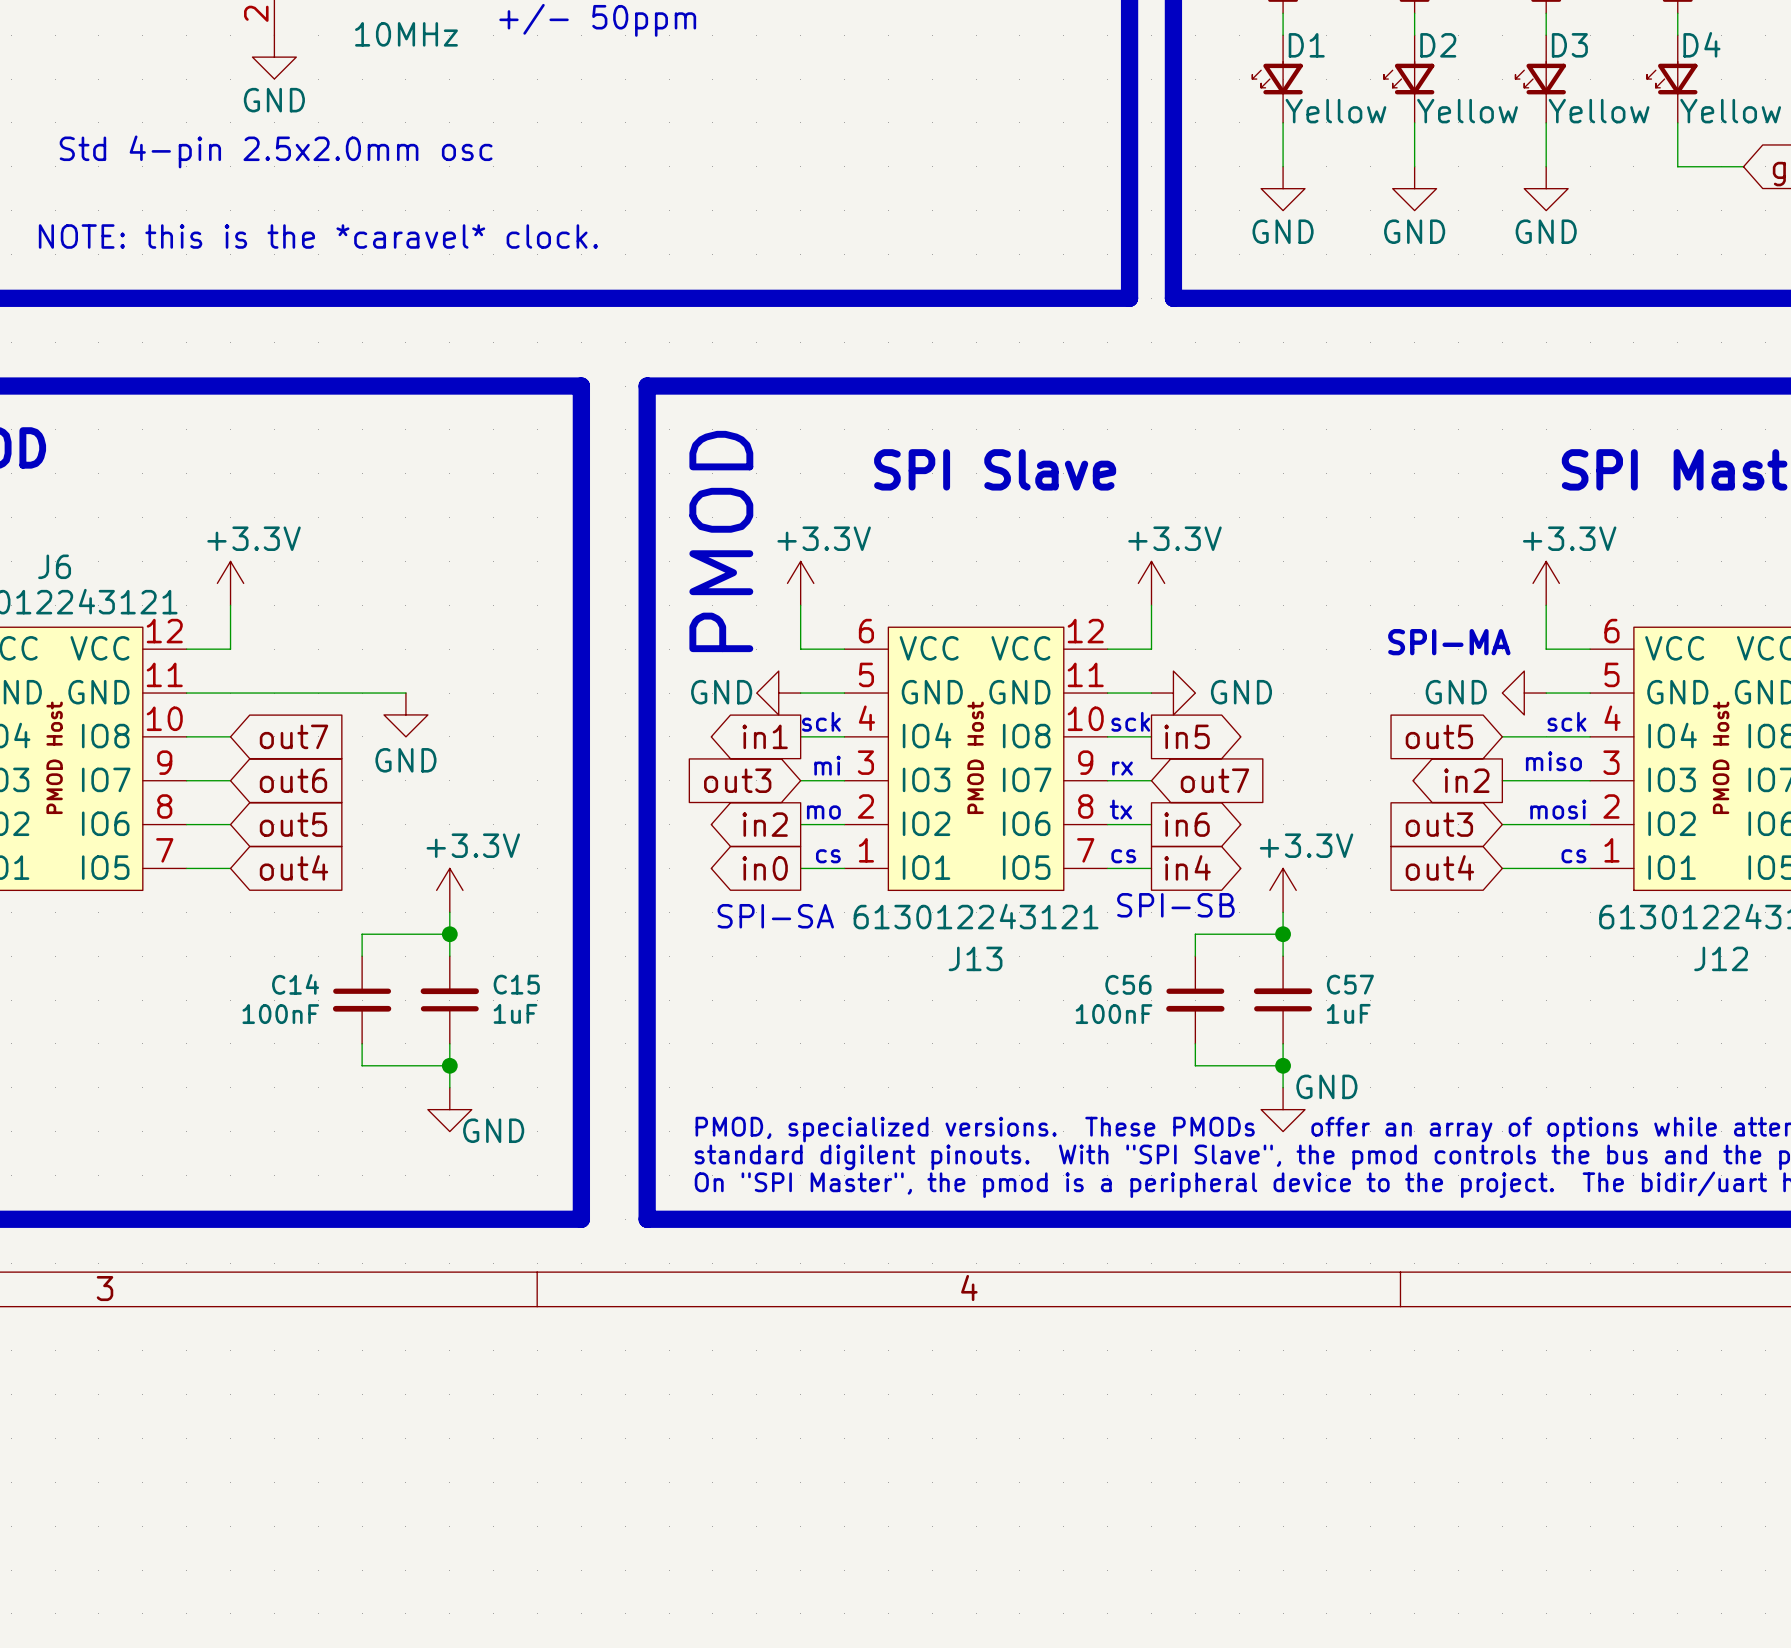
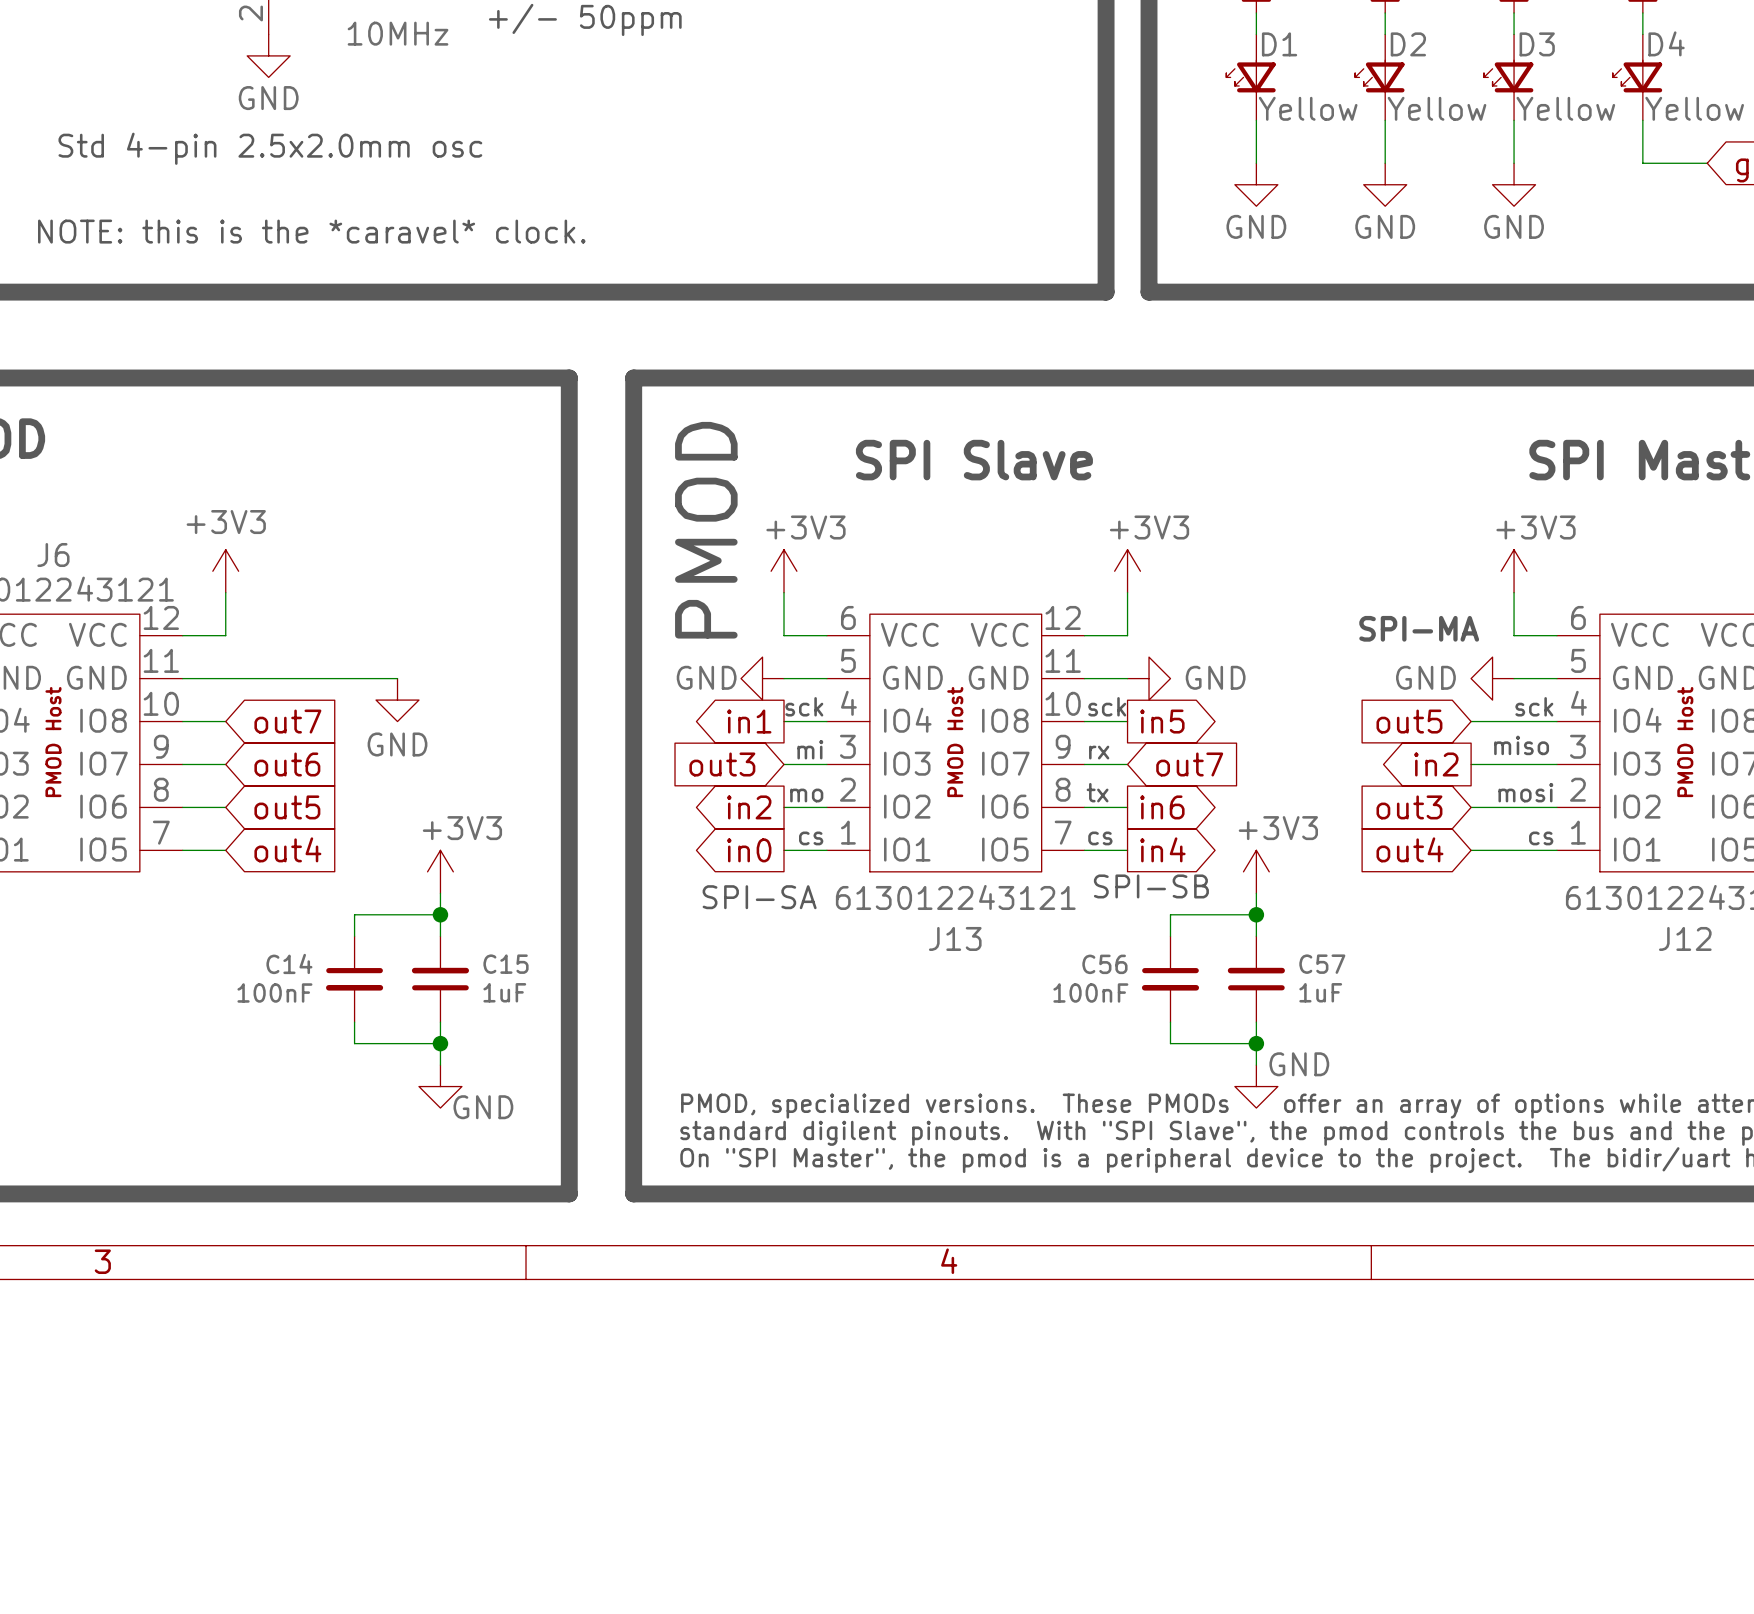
power symbol: +3.3V (230, 583) -> +3V3 (225, 571)
power symbol: +3.3V (800, 583) -> +3V3 (784, 571)
power symbol: +3.3V (1151, 583) -> +3V3 (1127, 571)
power symbol: +3.3V (1546, 583) -> +3V3 (1514, 571)
power symbol: +3.3V (449, 890) -> +3V3 (440, 871)
power symbol: +3.3V (1283, 890) -> +3V3 (1256, 871)

